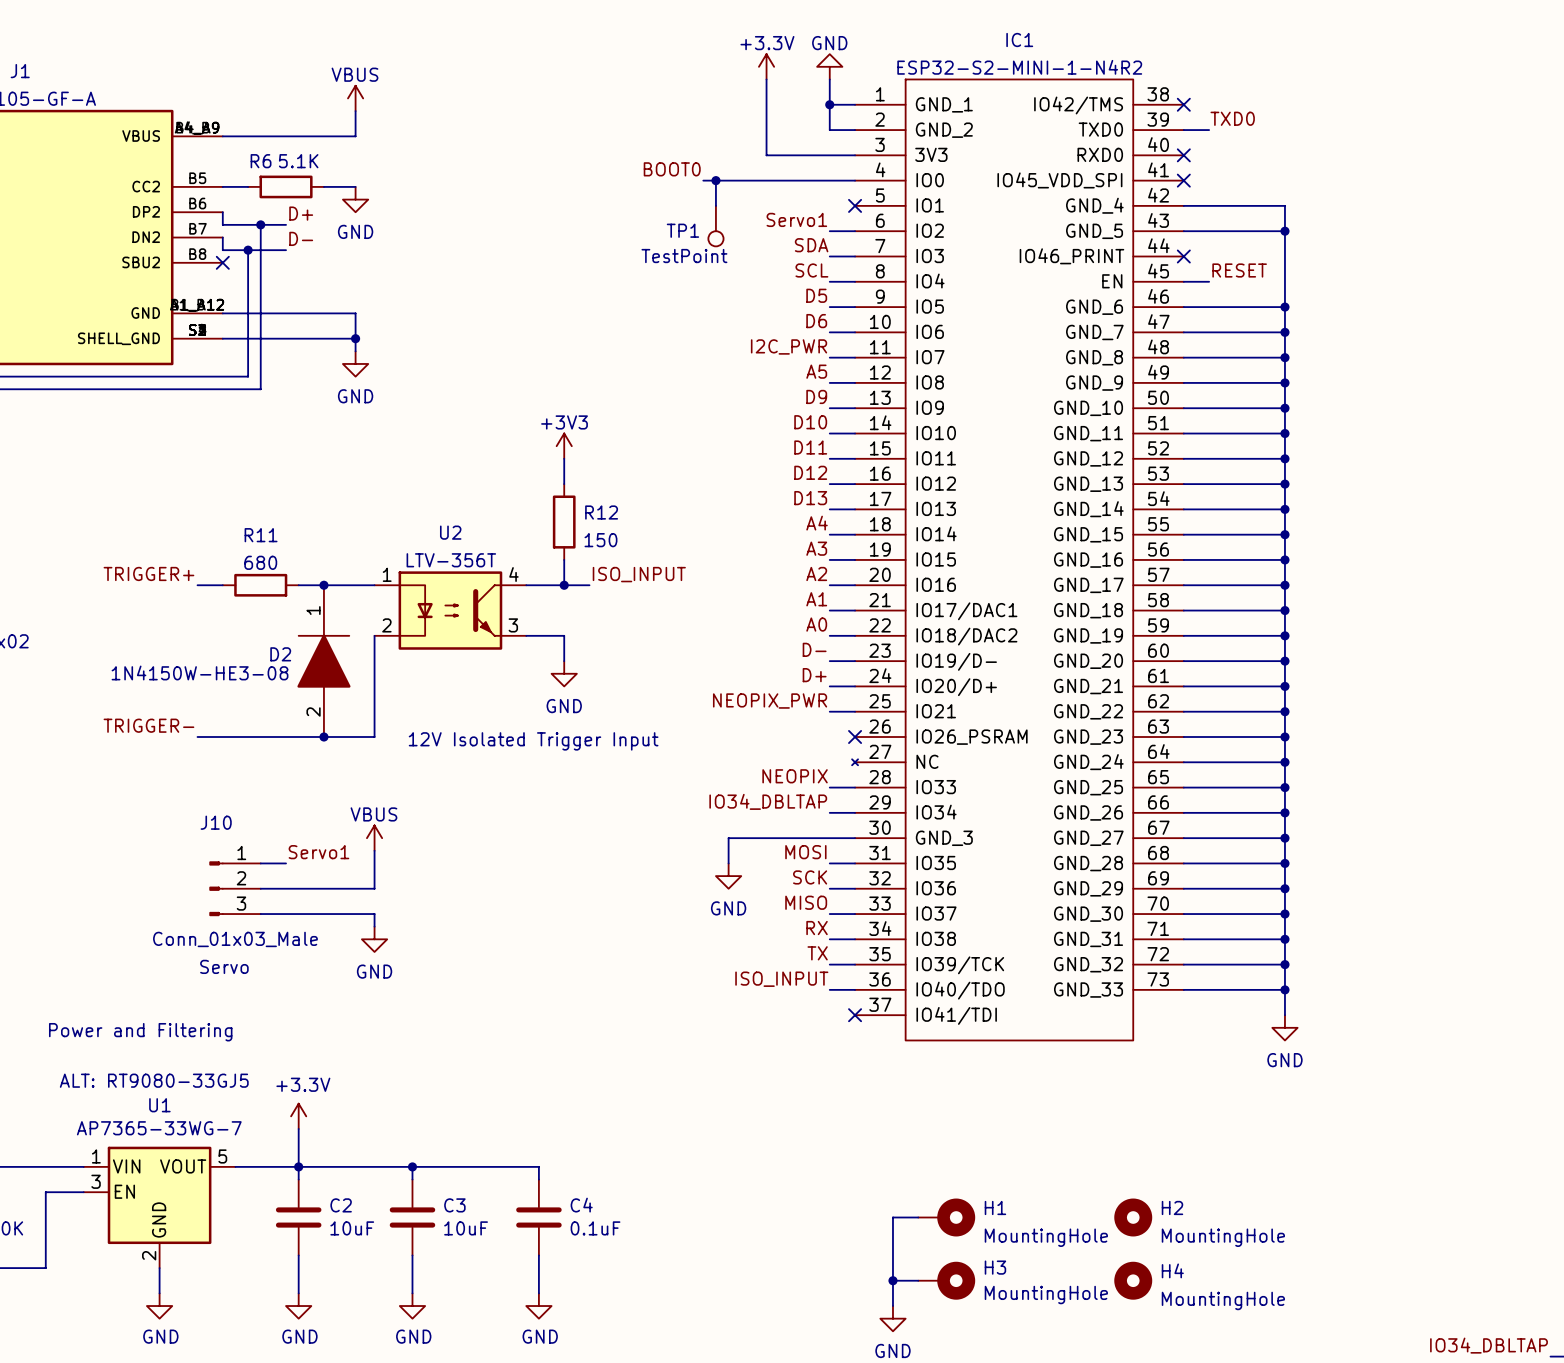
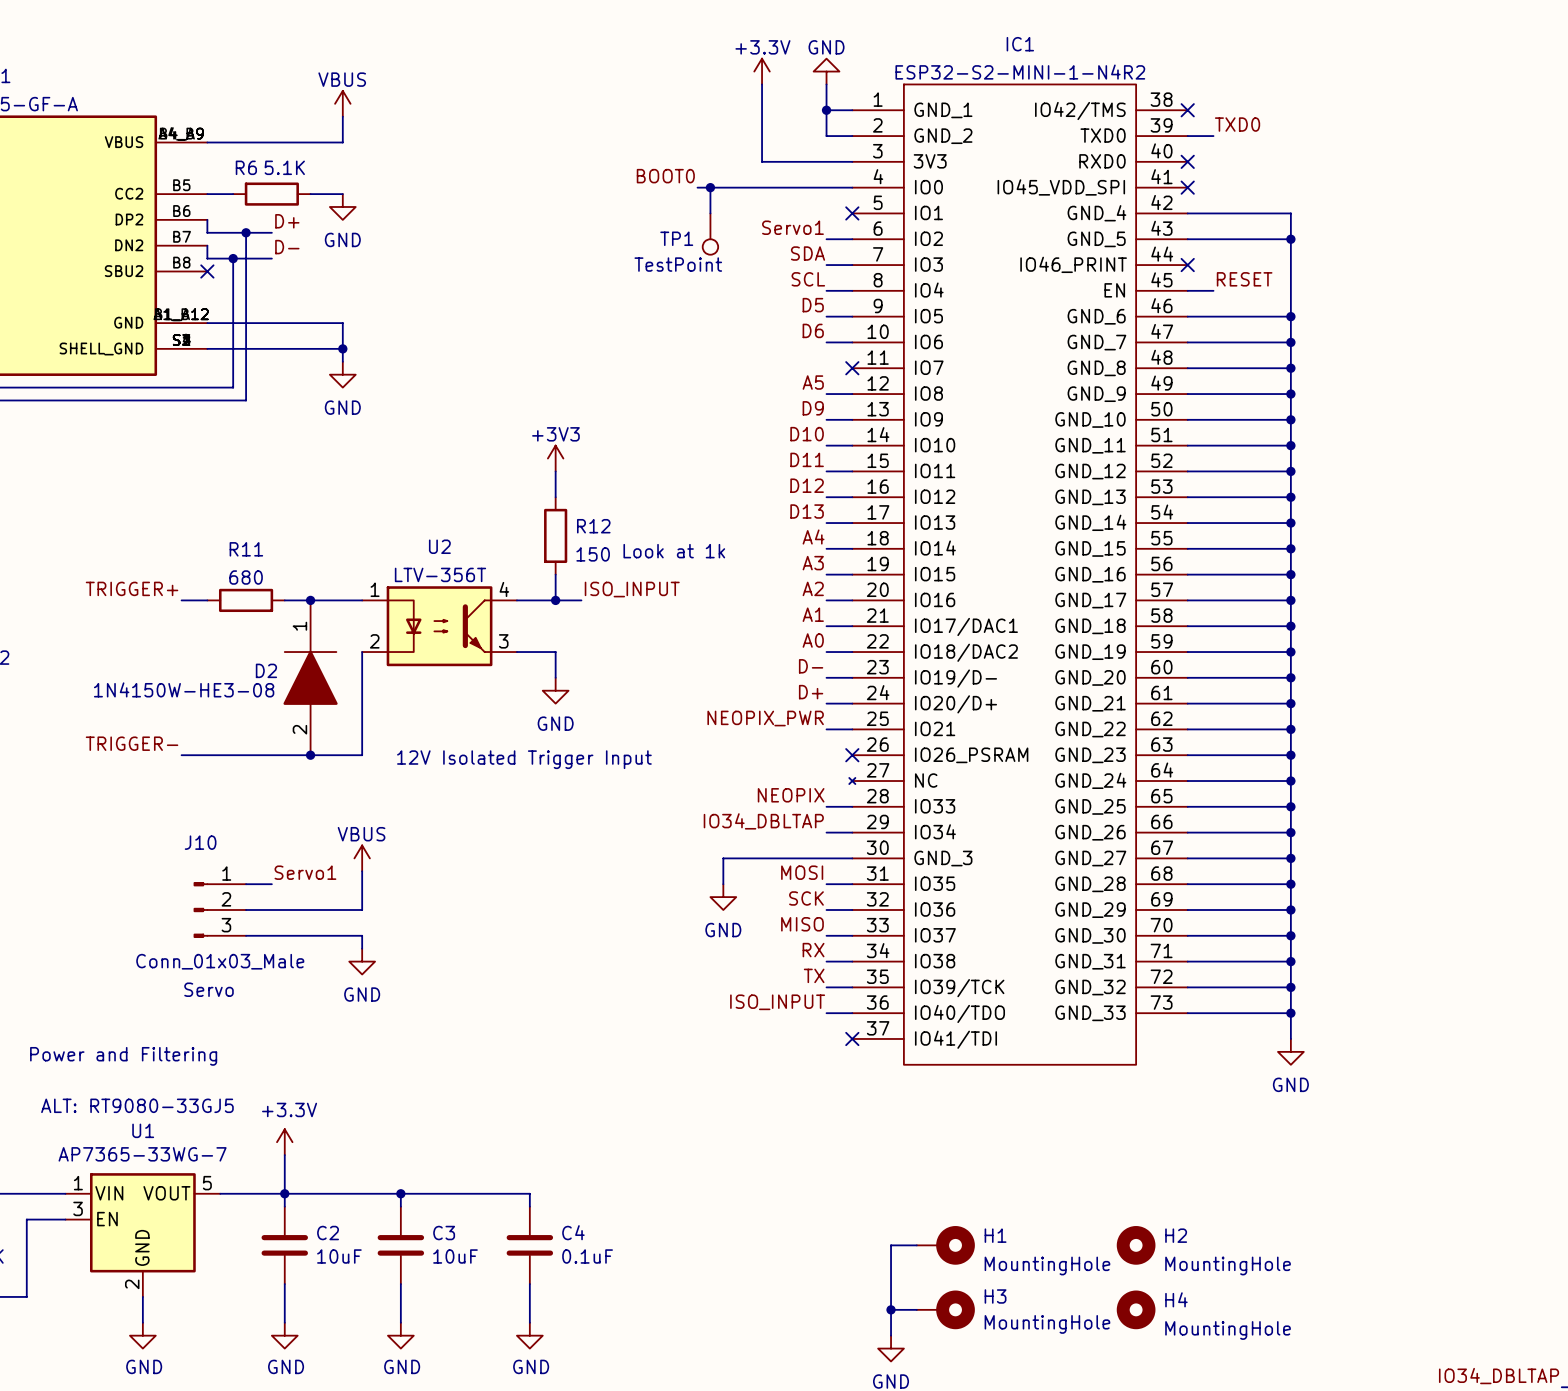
label: I2C_PWR (789, 346) -> none
wire: (829, 357) (855, 357) -> none
no-connect mark: none -> (852, 368)
text: none -> Look at 1k (674, 551)

